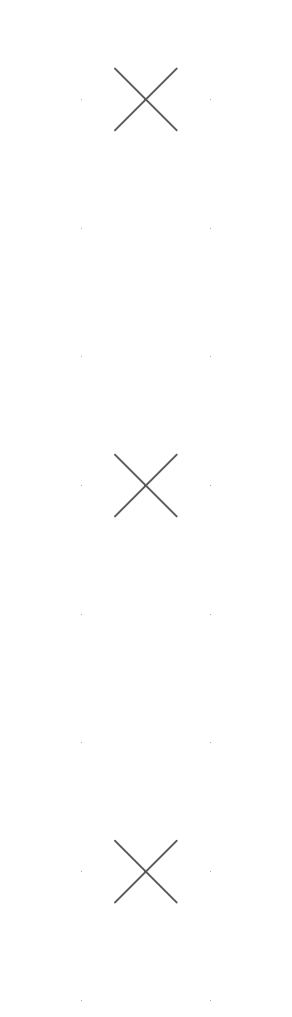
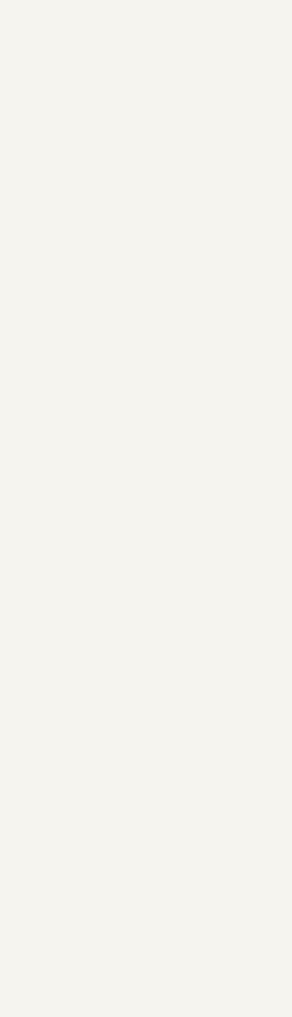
no-connect mark: (145, 99) -> none
no-connect mark: (145, 485) -> none
no-connect mark: (145, 871) -> none

